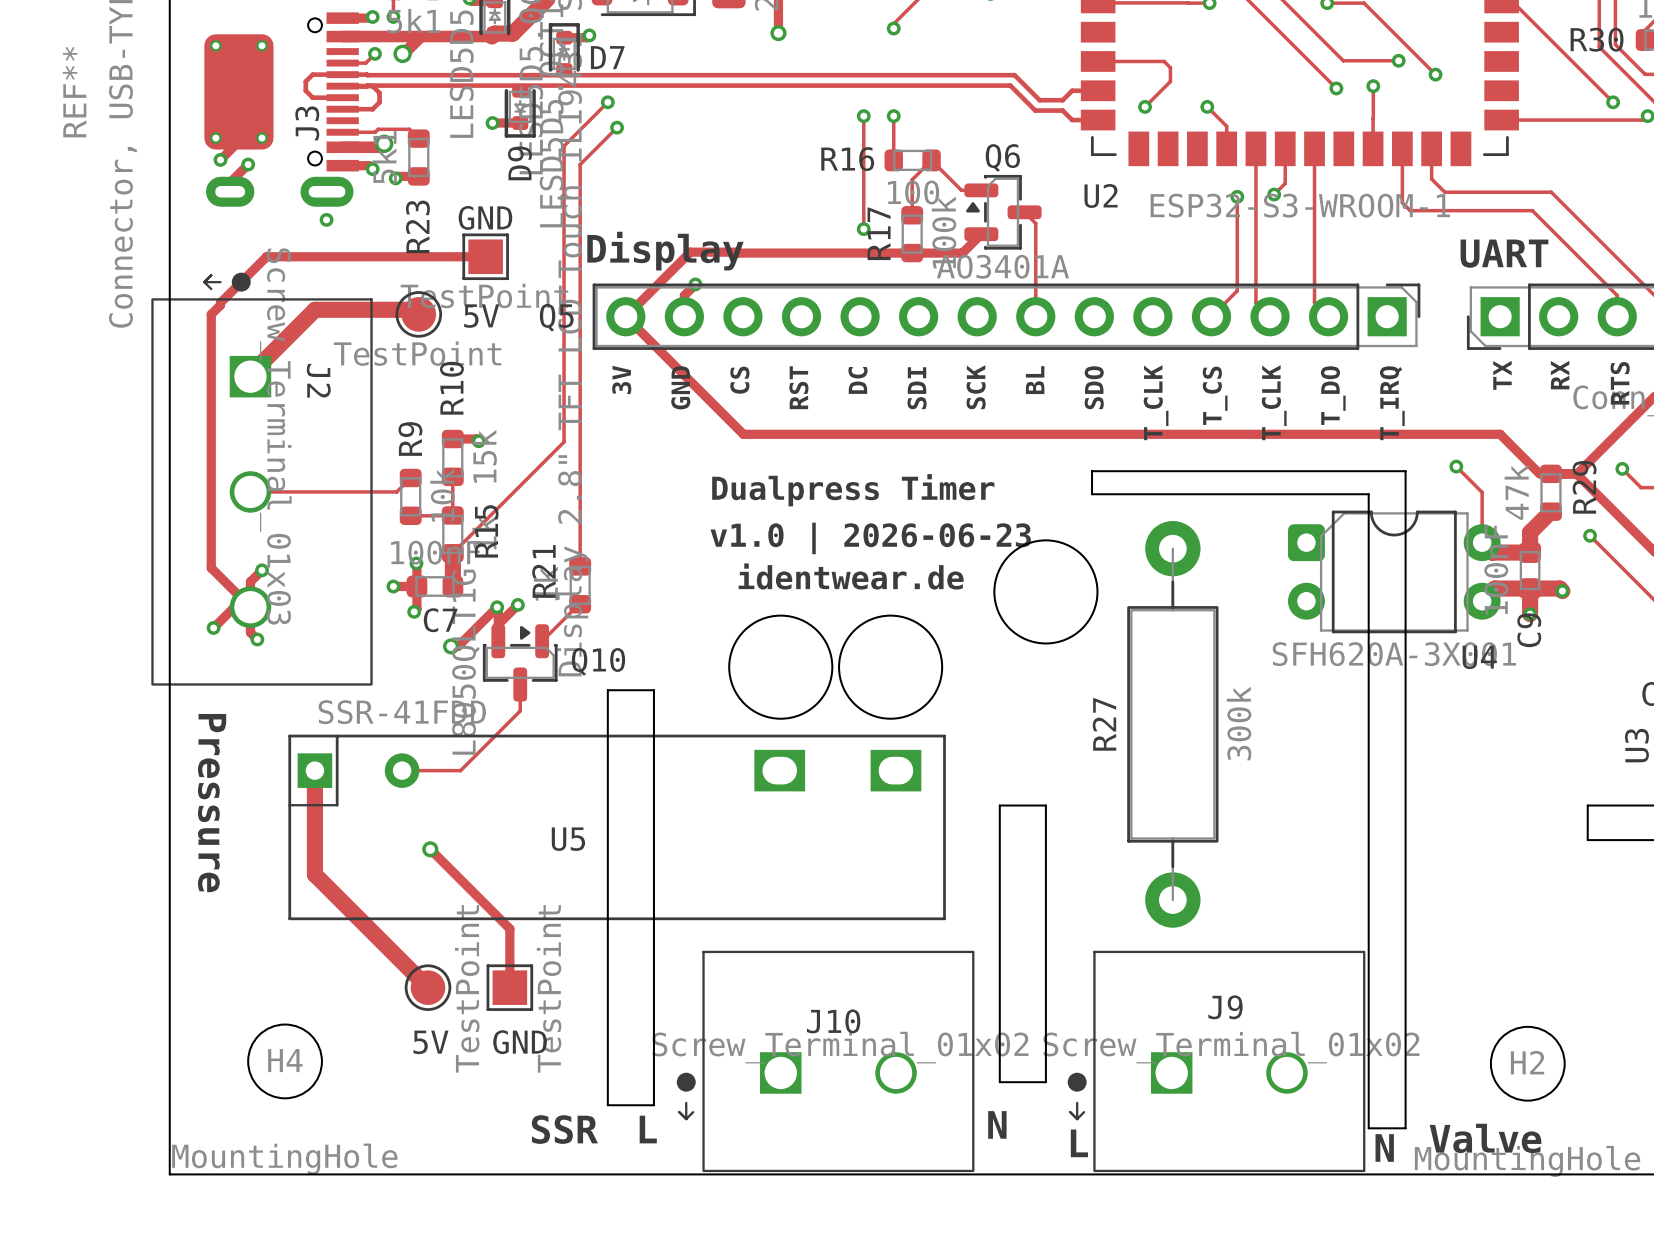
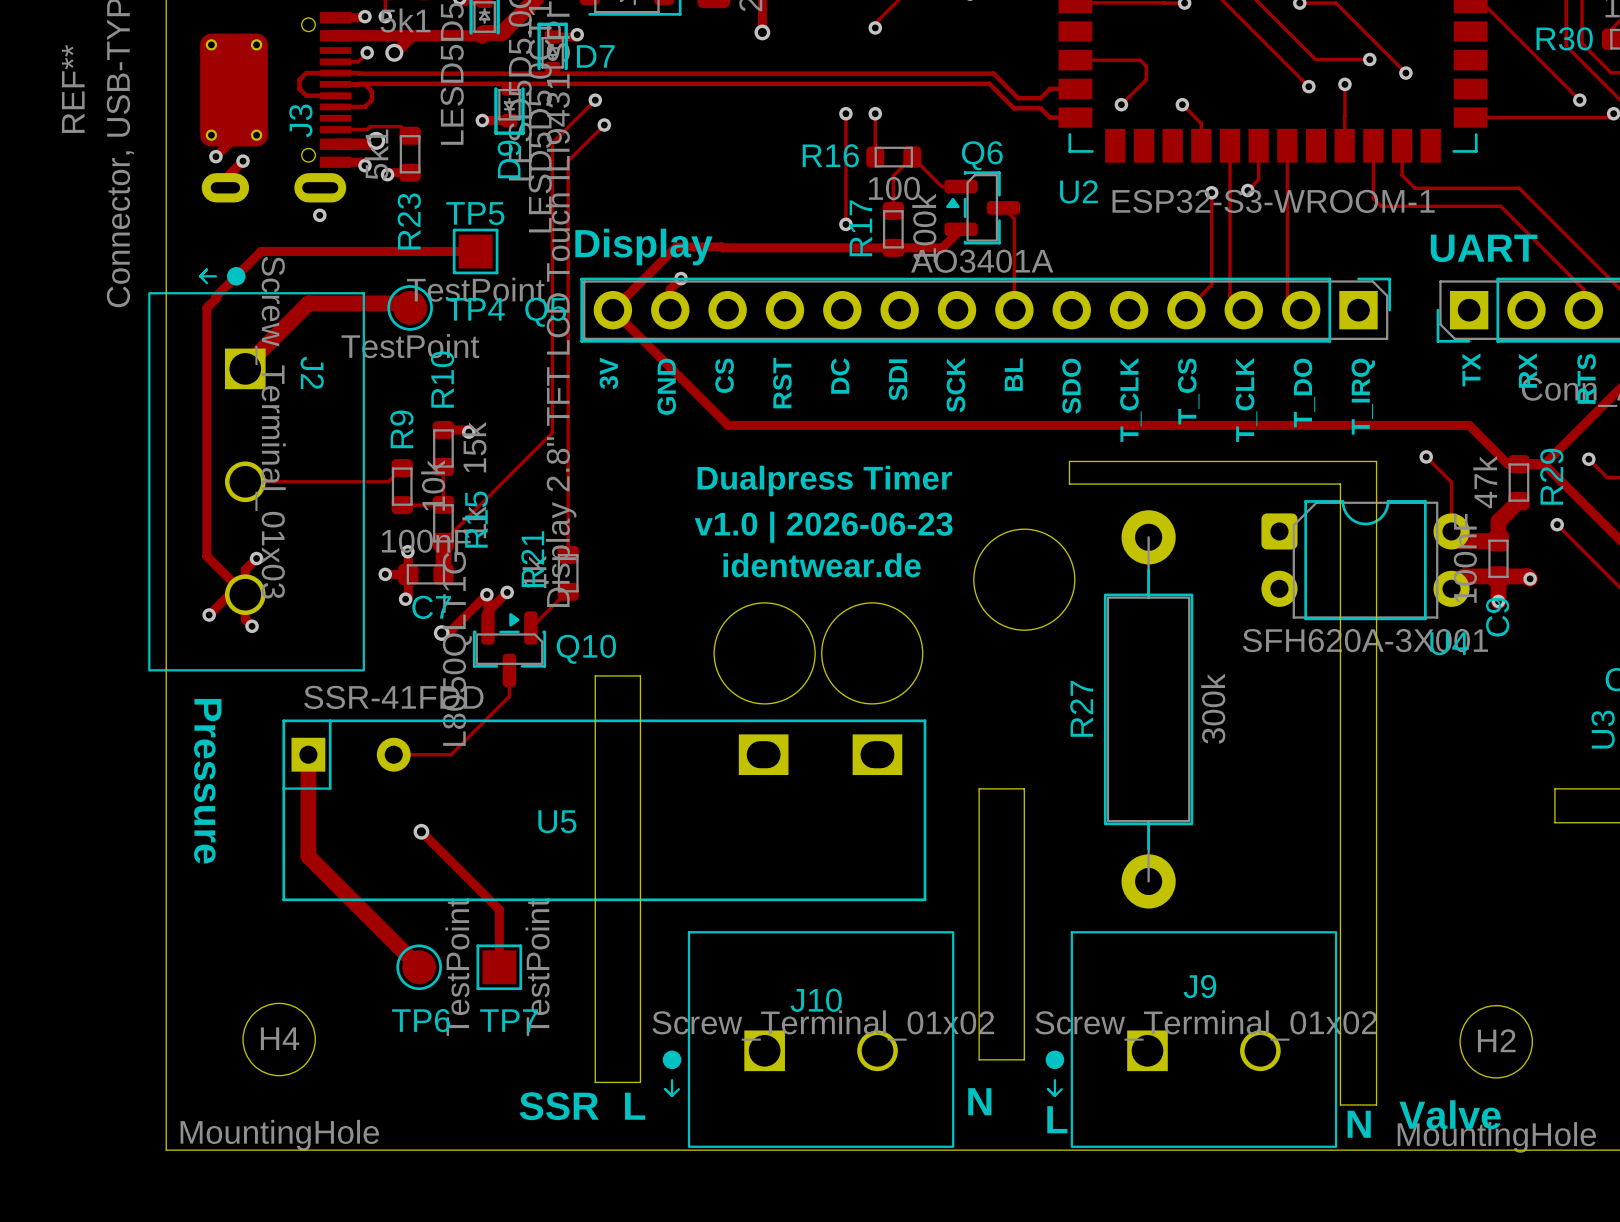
GND name: GND (485, 217) -> TP5 (475, 213)
5V name: 5V (481, 316) -> TP4 (475, 309)
5V name: 5V (430, 1042) -> TP6 (421, 1020)
GND name: GND (520, 1042) -> TP7 (509, 1020)

